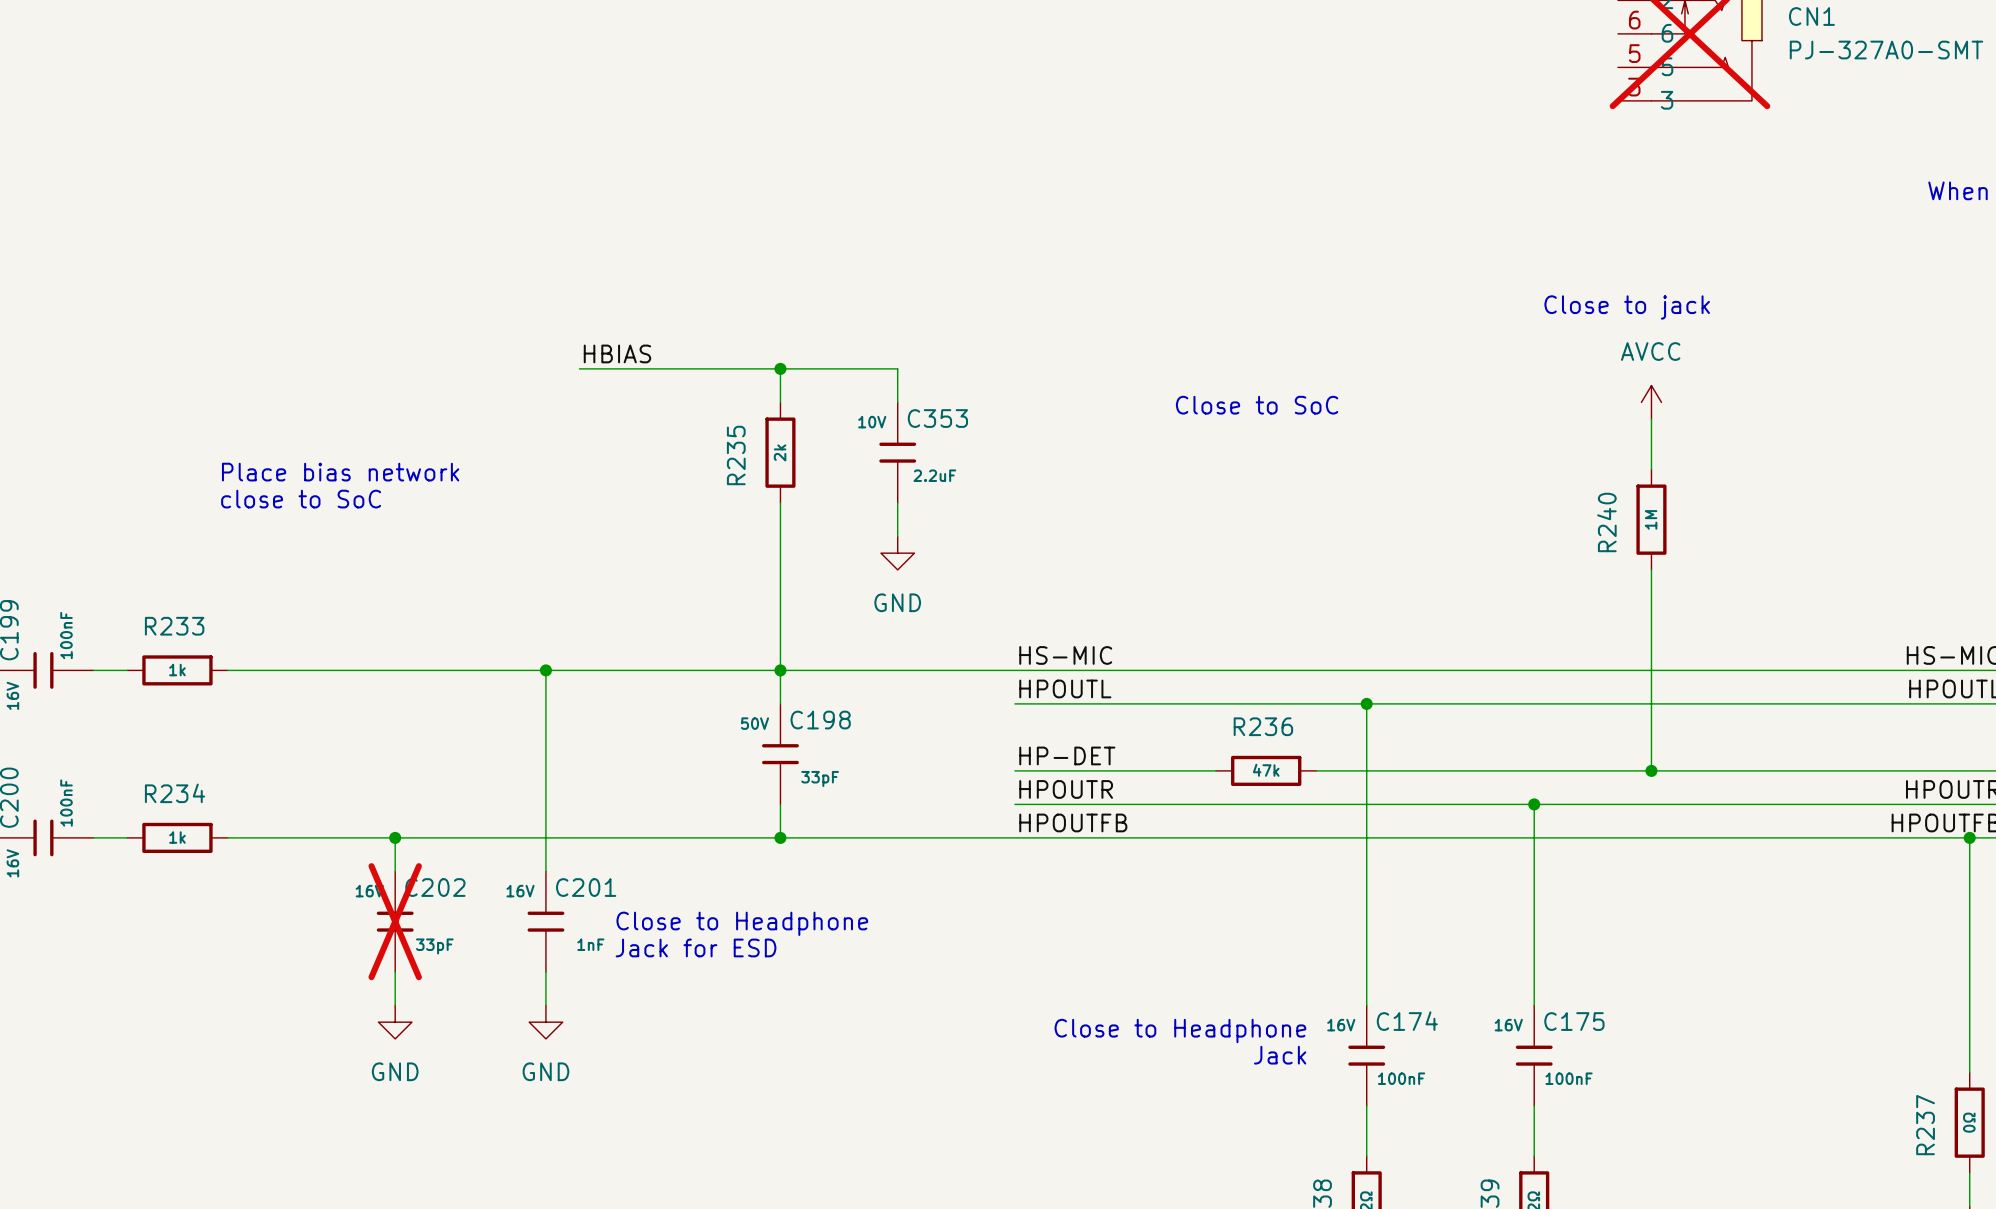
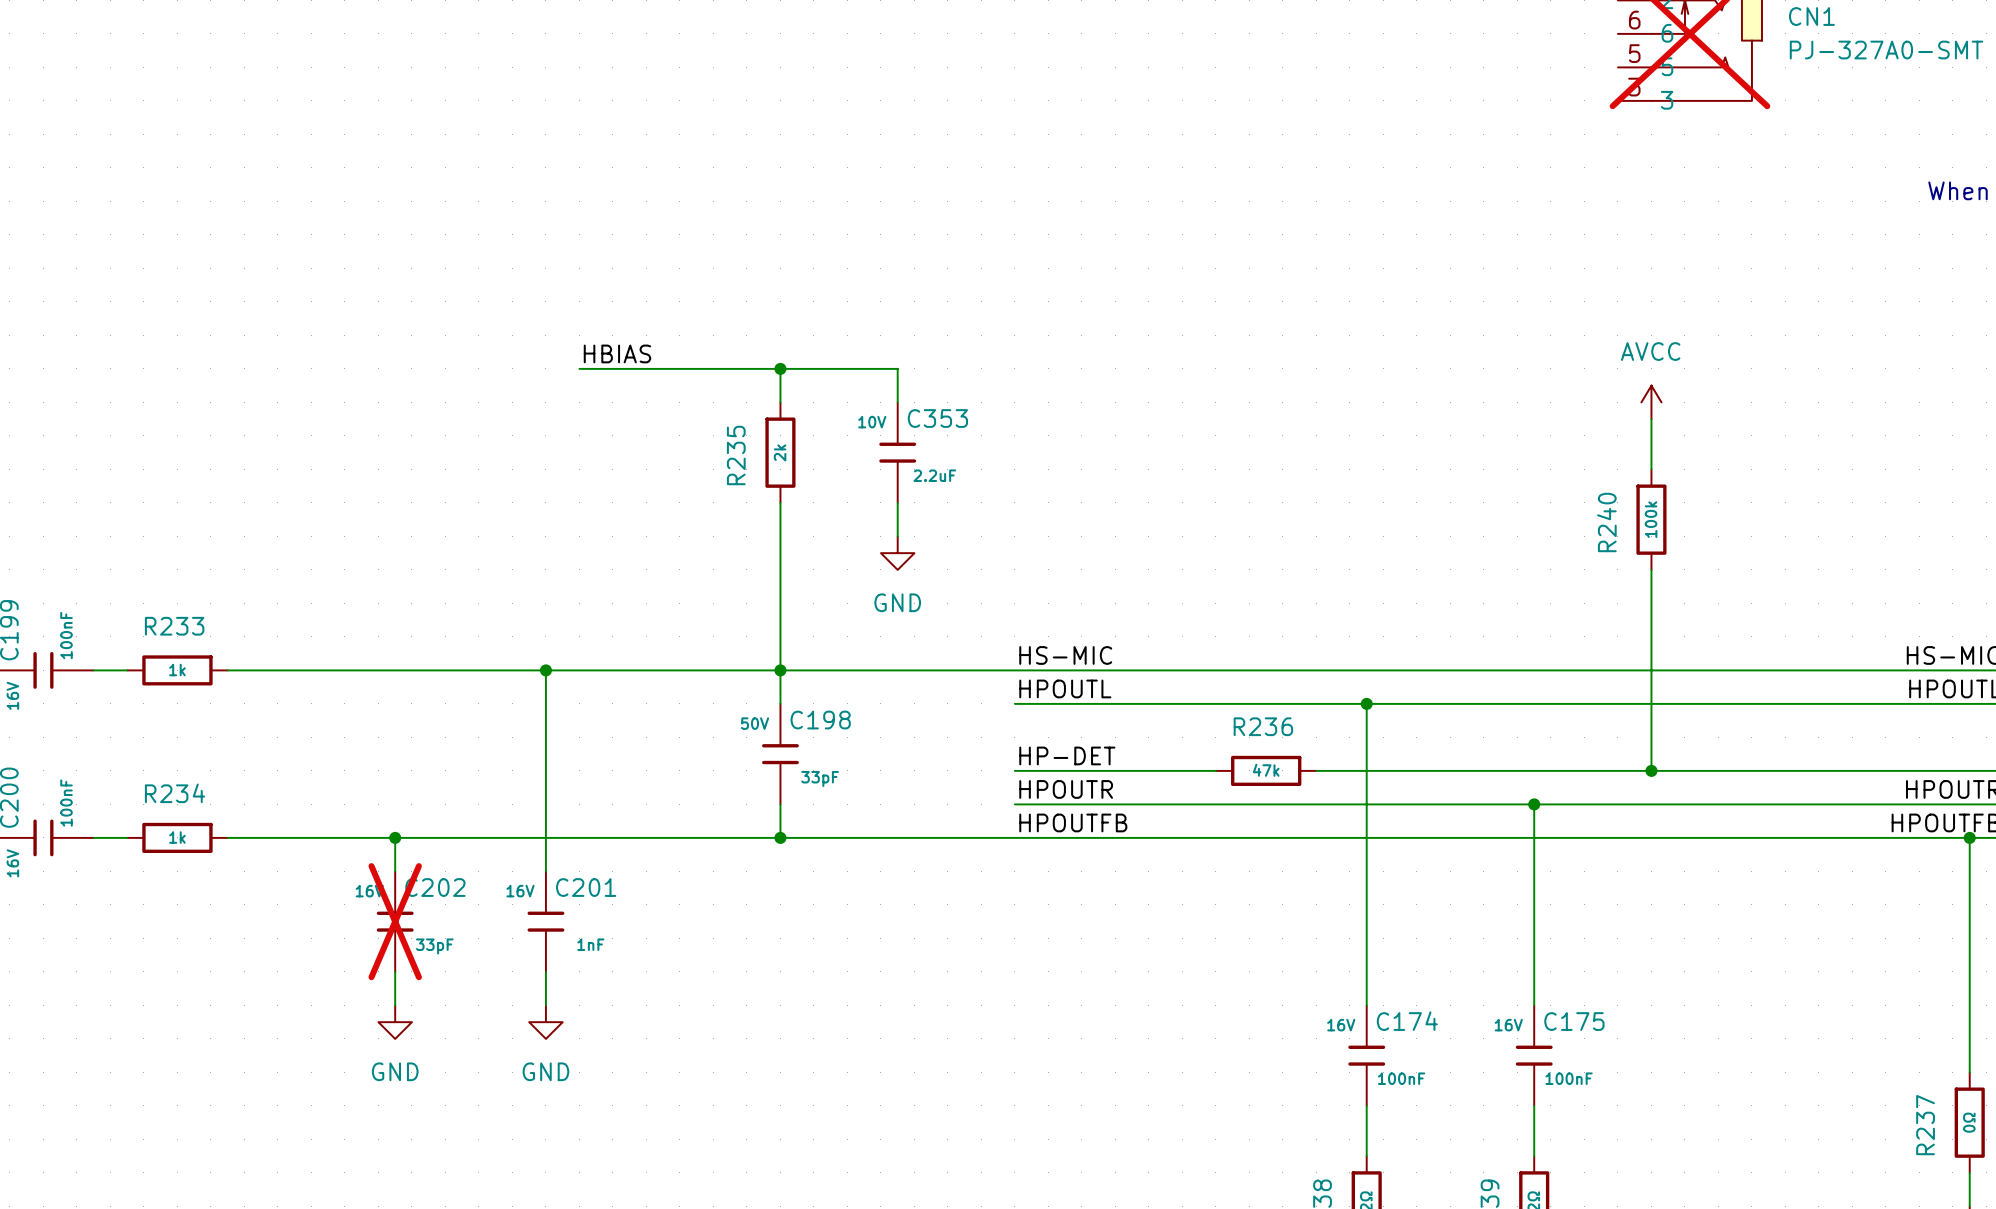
text: Close to jack (1627, 307) -> none
text: Close to SoC (1257, 405) -> none
text: Place bias network (340, 472) -> none
text: close to SoC (301, 499) -> none
R240 value: 1M (1651, 519) -> 100k (1651, 519)
text: Close to Headphone (742, 923) -> none
text: Jack for ESD (696, 947) -> none
text: Close to Headphone (1180, 1030) -> none
text: Jack (1280, 1055) -> none

